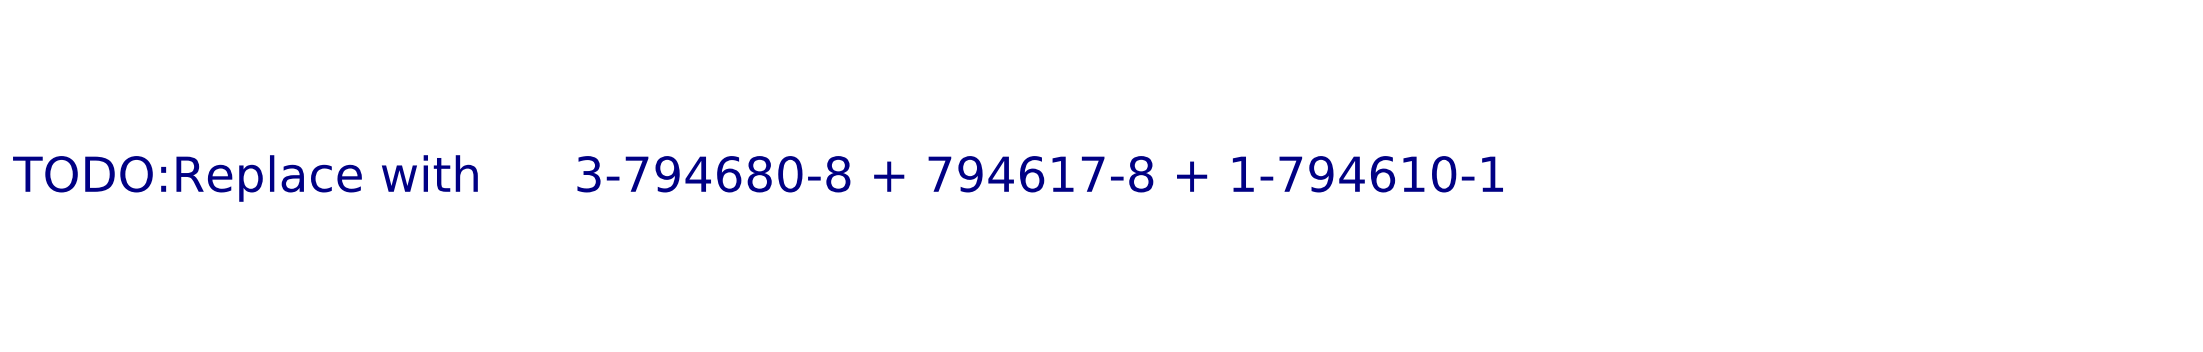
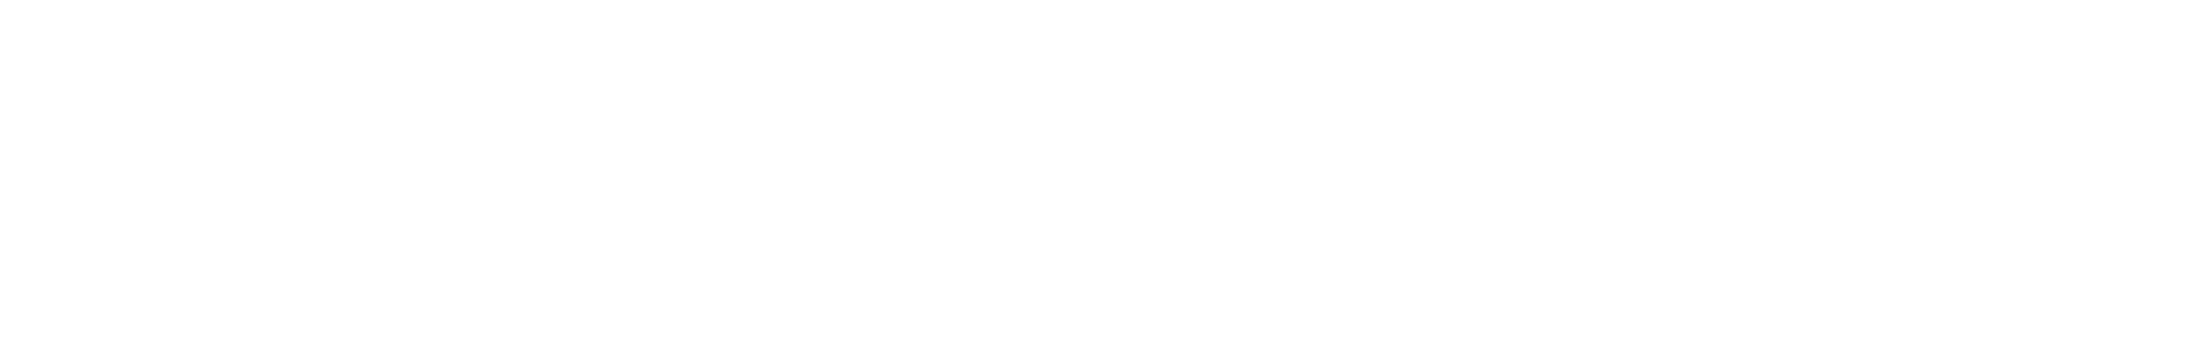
text: TODO:Replace with 3-794680-8 + 794617-8 + 1-794610-1 (758, 178) -> none

